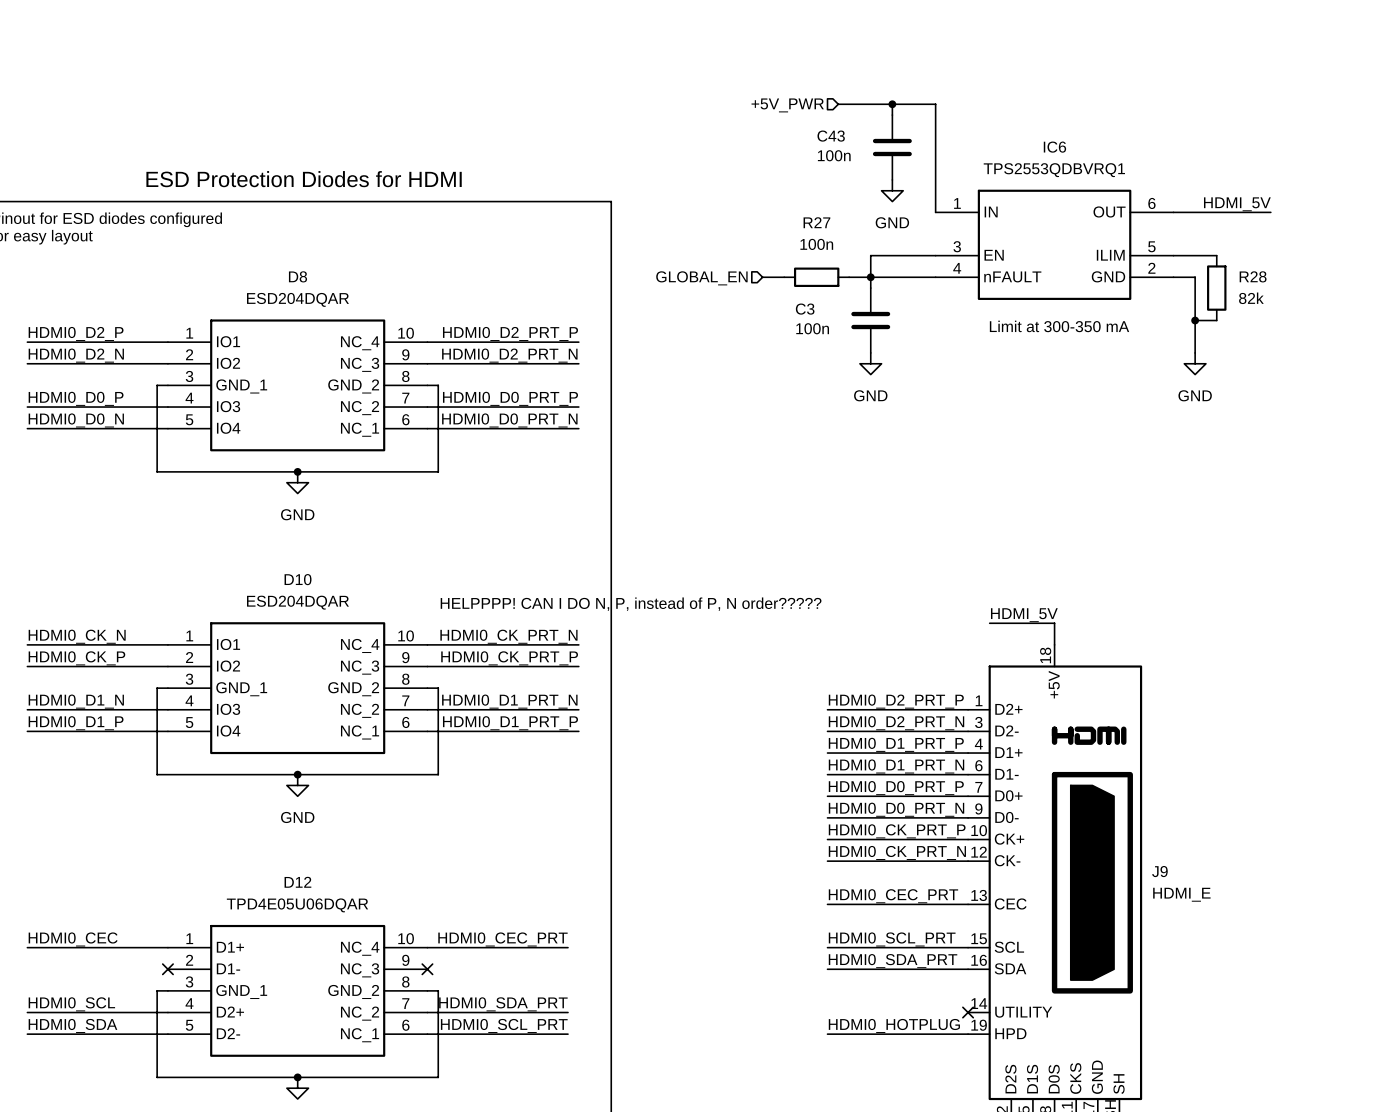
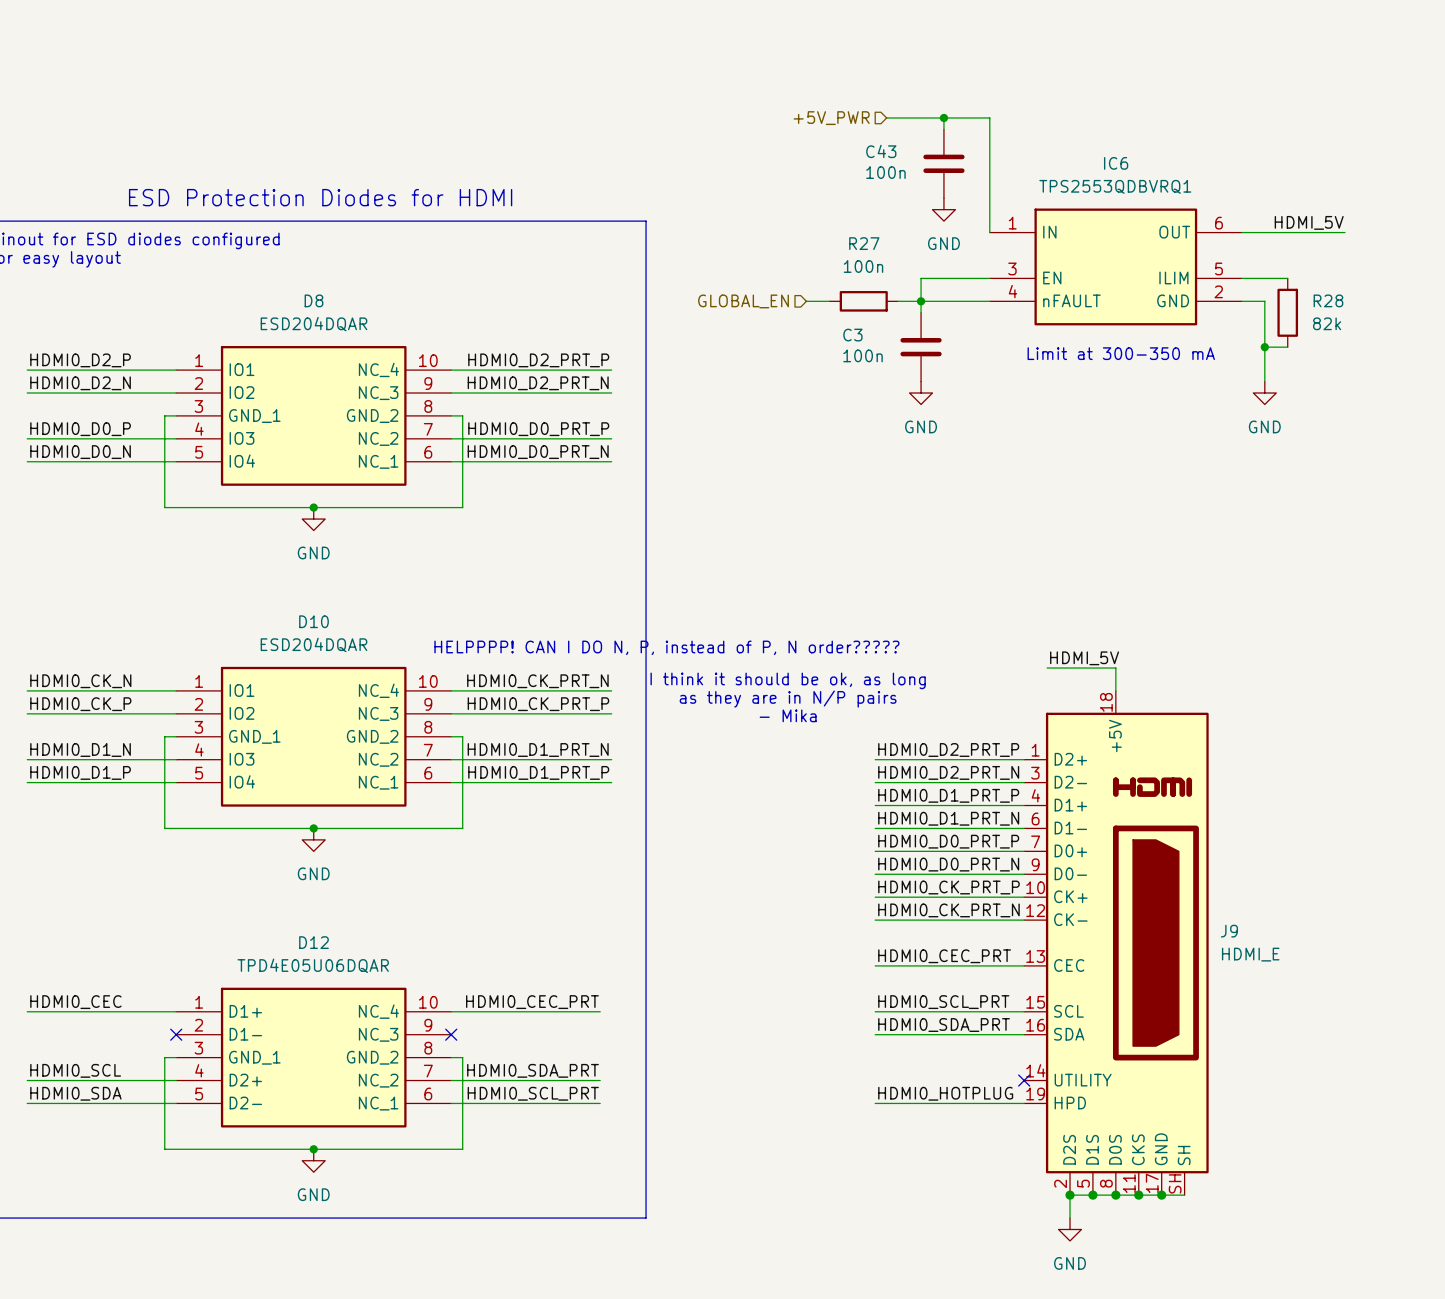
text: none -> I think it should be ok, as long (788, 680)
text: none -> as they are in N/P pairs (788, 699)
text: none -> - Mika (788, 715)

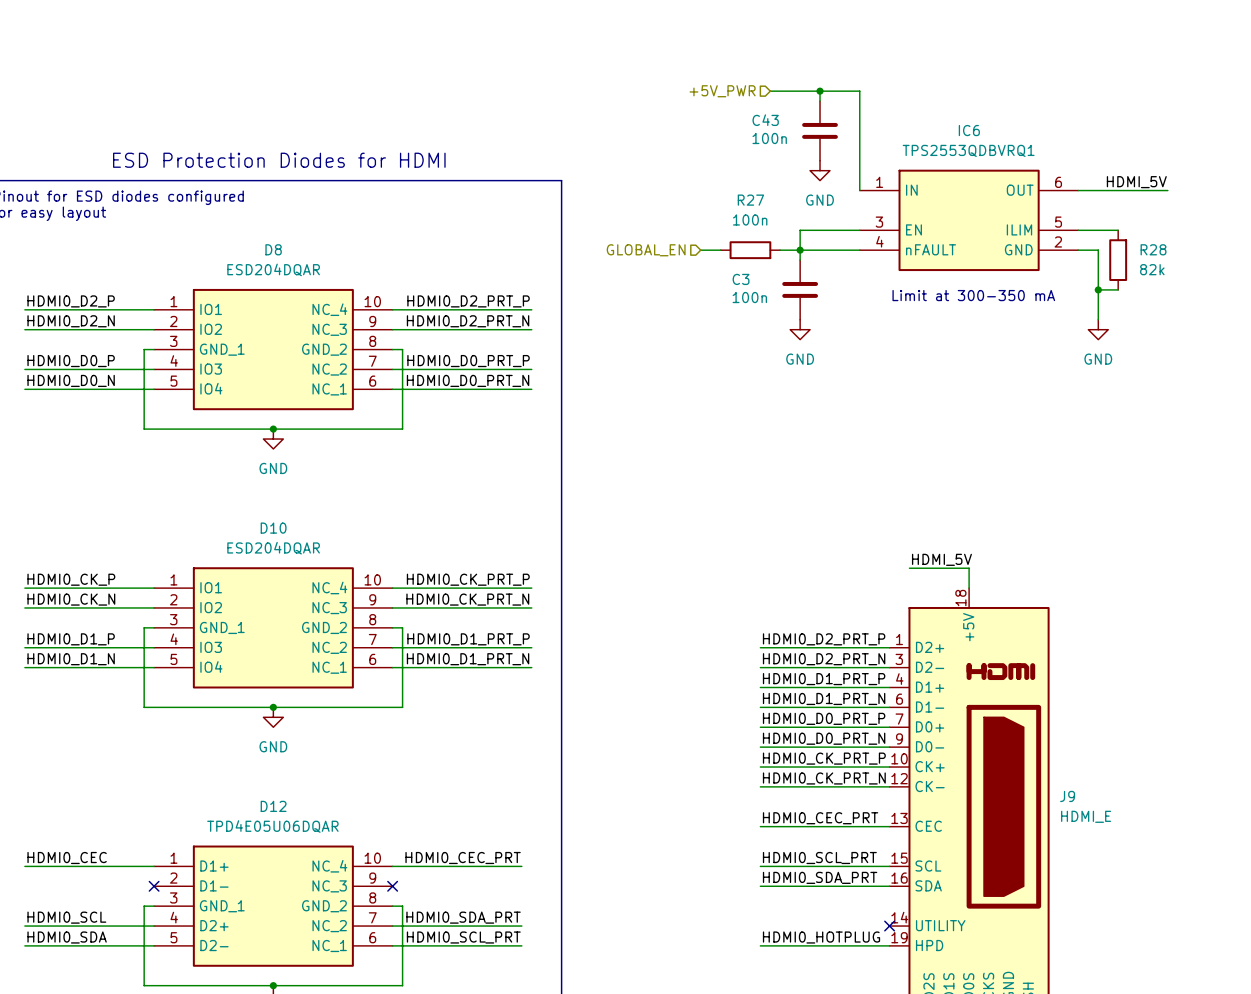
text: HELPPPP! CAN I DO N, P, instead of P, N order????? (666, 647) -> none
text: I think it should be ok, as long (788, 680) -> none
label: HDMI0_CK_N (80, 681) -> HDMI0_CK_P (71, 579)
label: HDMI0_CK_PRT_N (537, 681) -> HDMI0_CK_PRT_P (468, 579)
text: as they are in N/P pairs (788, 699) -> none
label: HDMI0_CK_P (80, 704) -> HDMI0_CK_N (71, 599)
label: HDMI0_CK_PRT_P (538, 704) -> HDMI0_CK_PRT_N (467, 599)
text: - Mika (788, 715) -> none
label: HDMI0_D1_N (80, 750) -> HDMI0_D1_P (71, 639)
label: HDMI0_D1_PRT_N (538, 750) -> HDMI0_D1_PRT_P (468, 639)
label: HDMI0_D1_P (80, 772) -> HDMI0_D1_N (71, 659)
label: HDMI0_D1_PRT_P (538, 772) -> HDMI0_D1_PRT_N (468, 659)

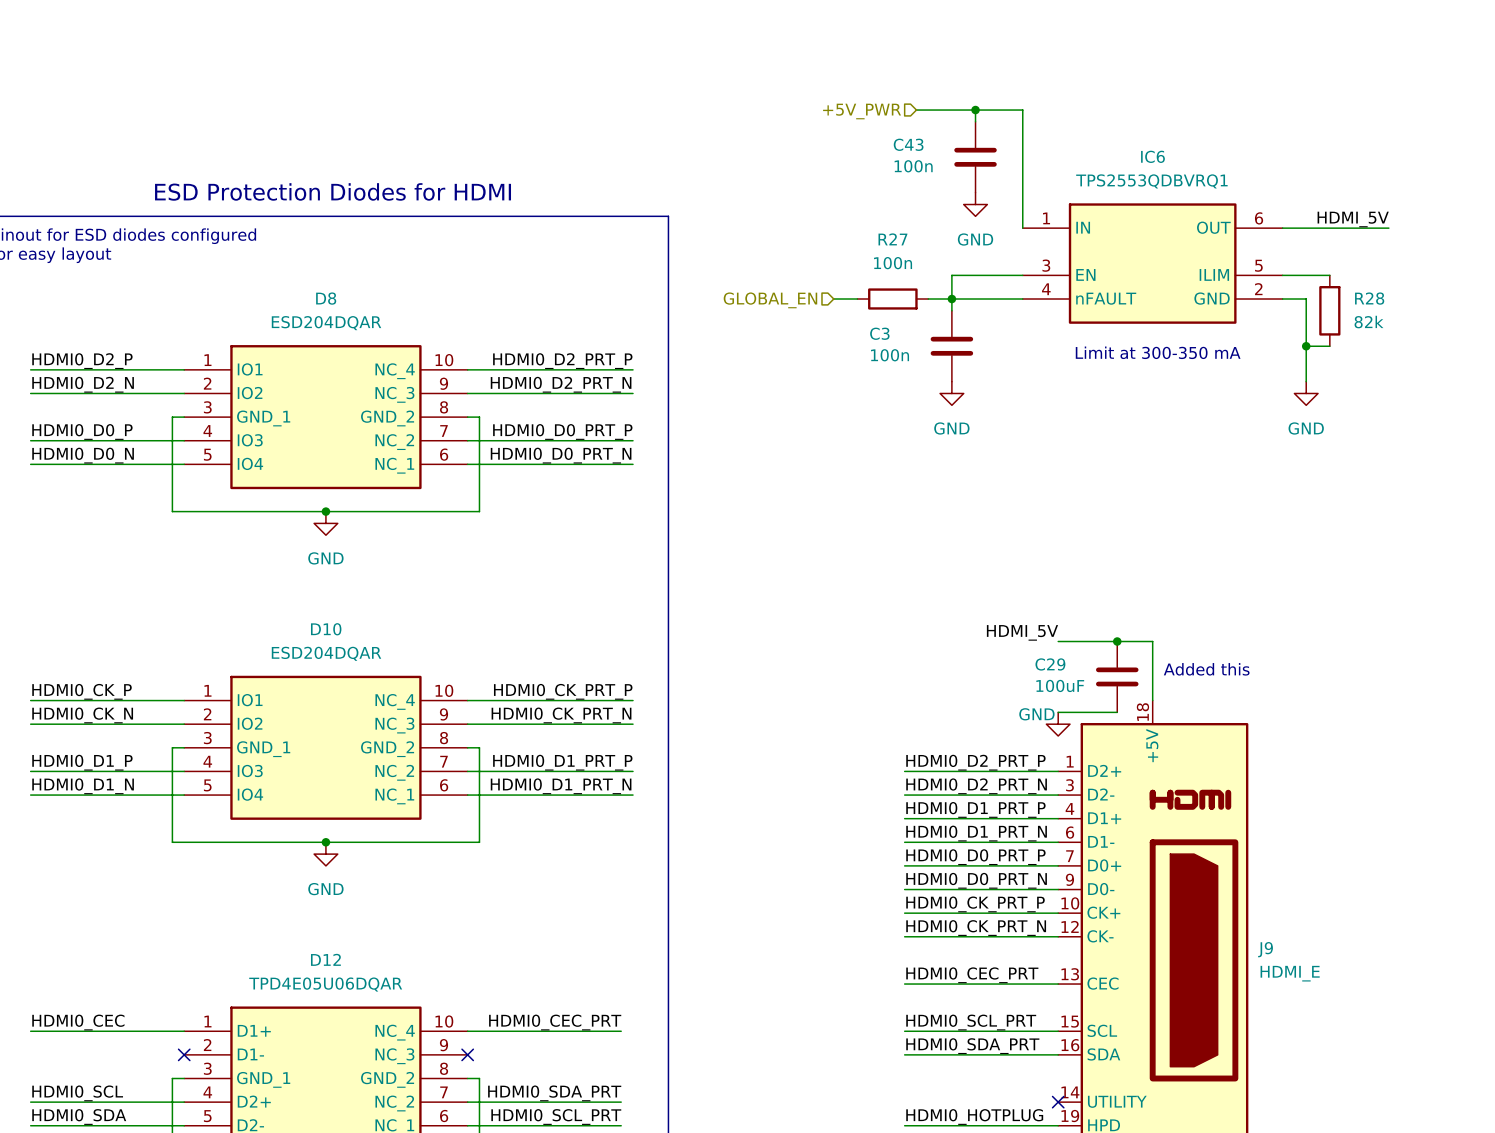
junction: none -> (1117, 641)
label position: HDMI_5V (941, 559) -> HDMI_5V (1022, 632)
text: none -> Added this (1206, 669)
wire: (909, 568) (969, 568) -> (1058, 641) (1152, 641) (1152, 676)
C29: none -> 100uF (1117, 676)
wire: none -> (1058, 712) (1117, 712)
power symbol: none -> GND (1058, 724)

